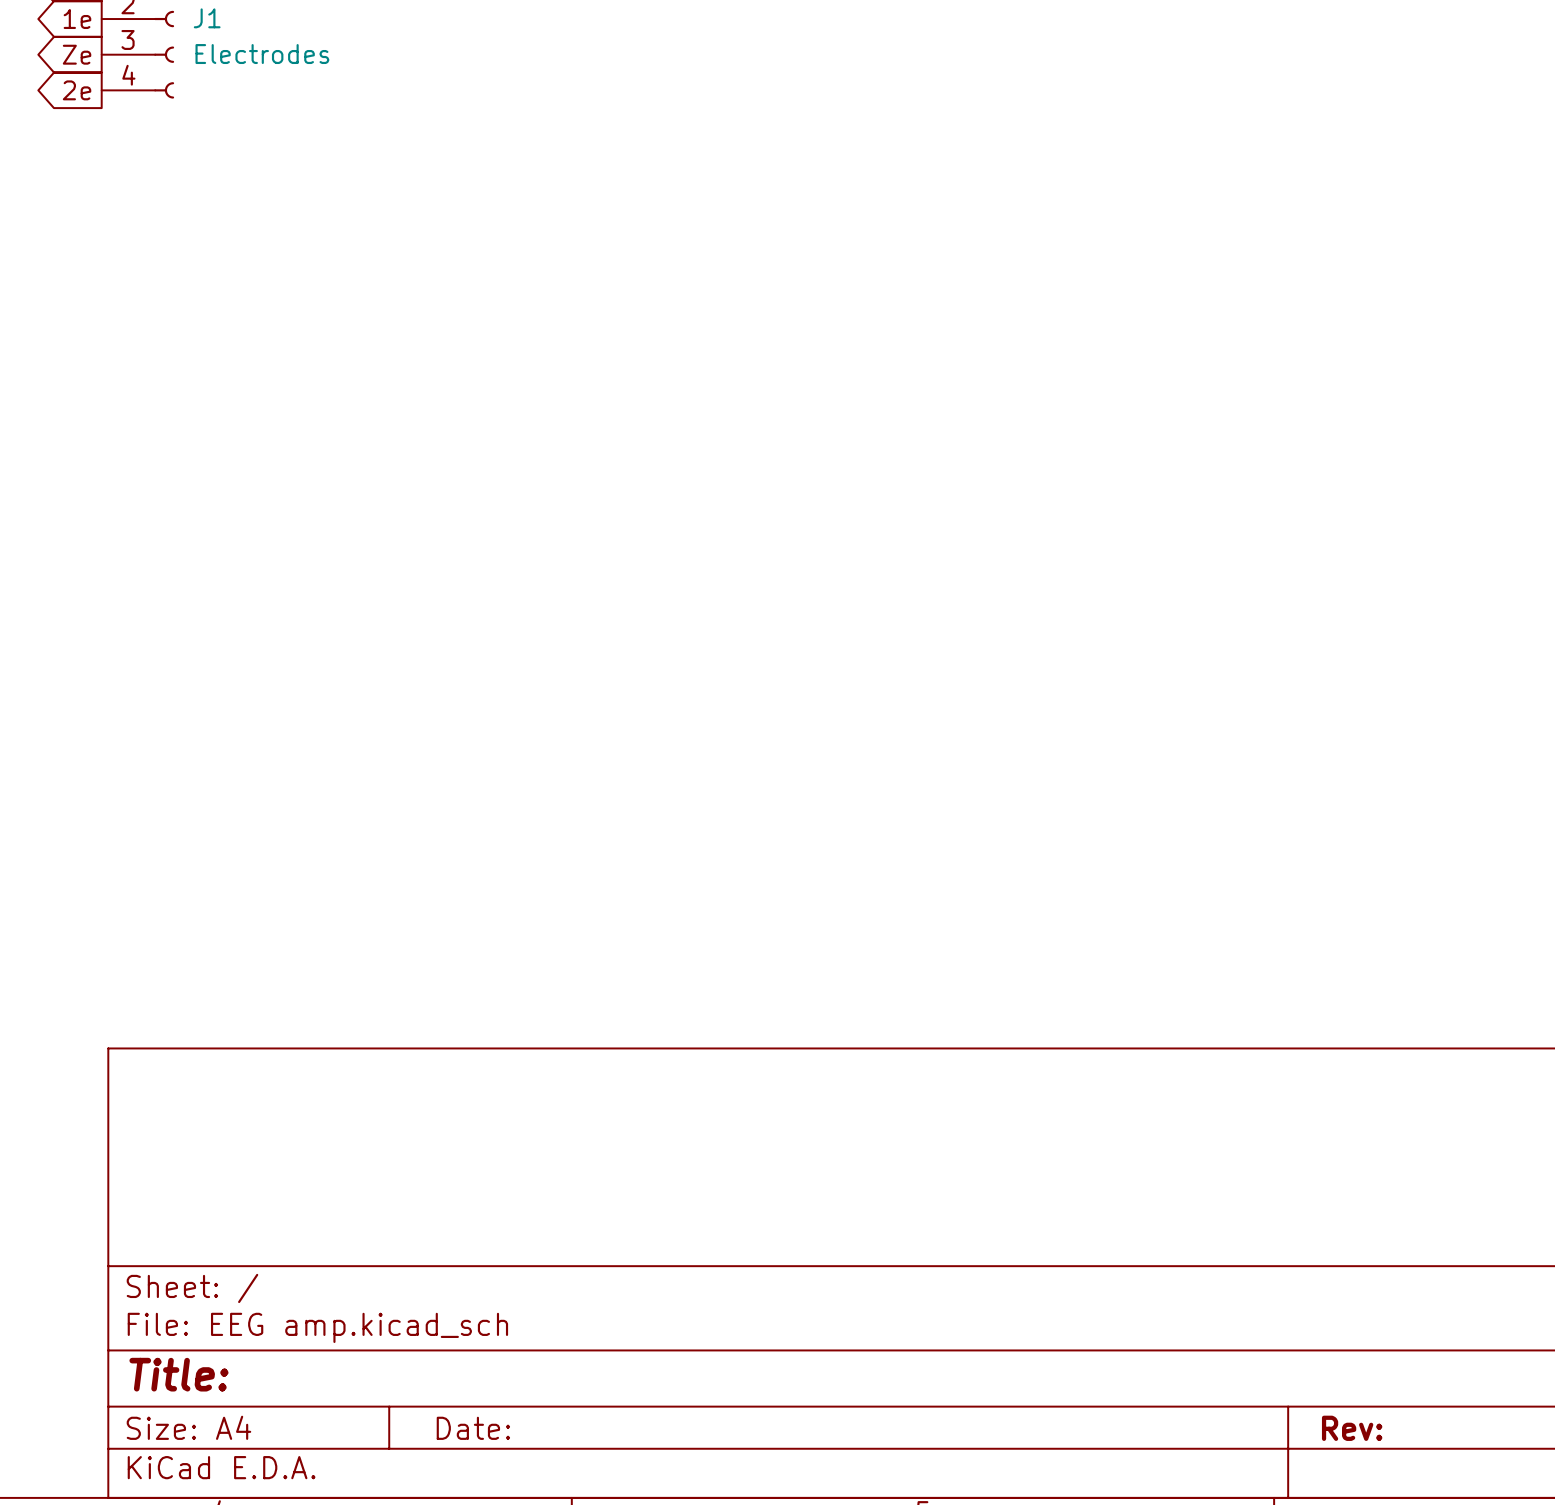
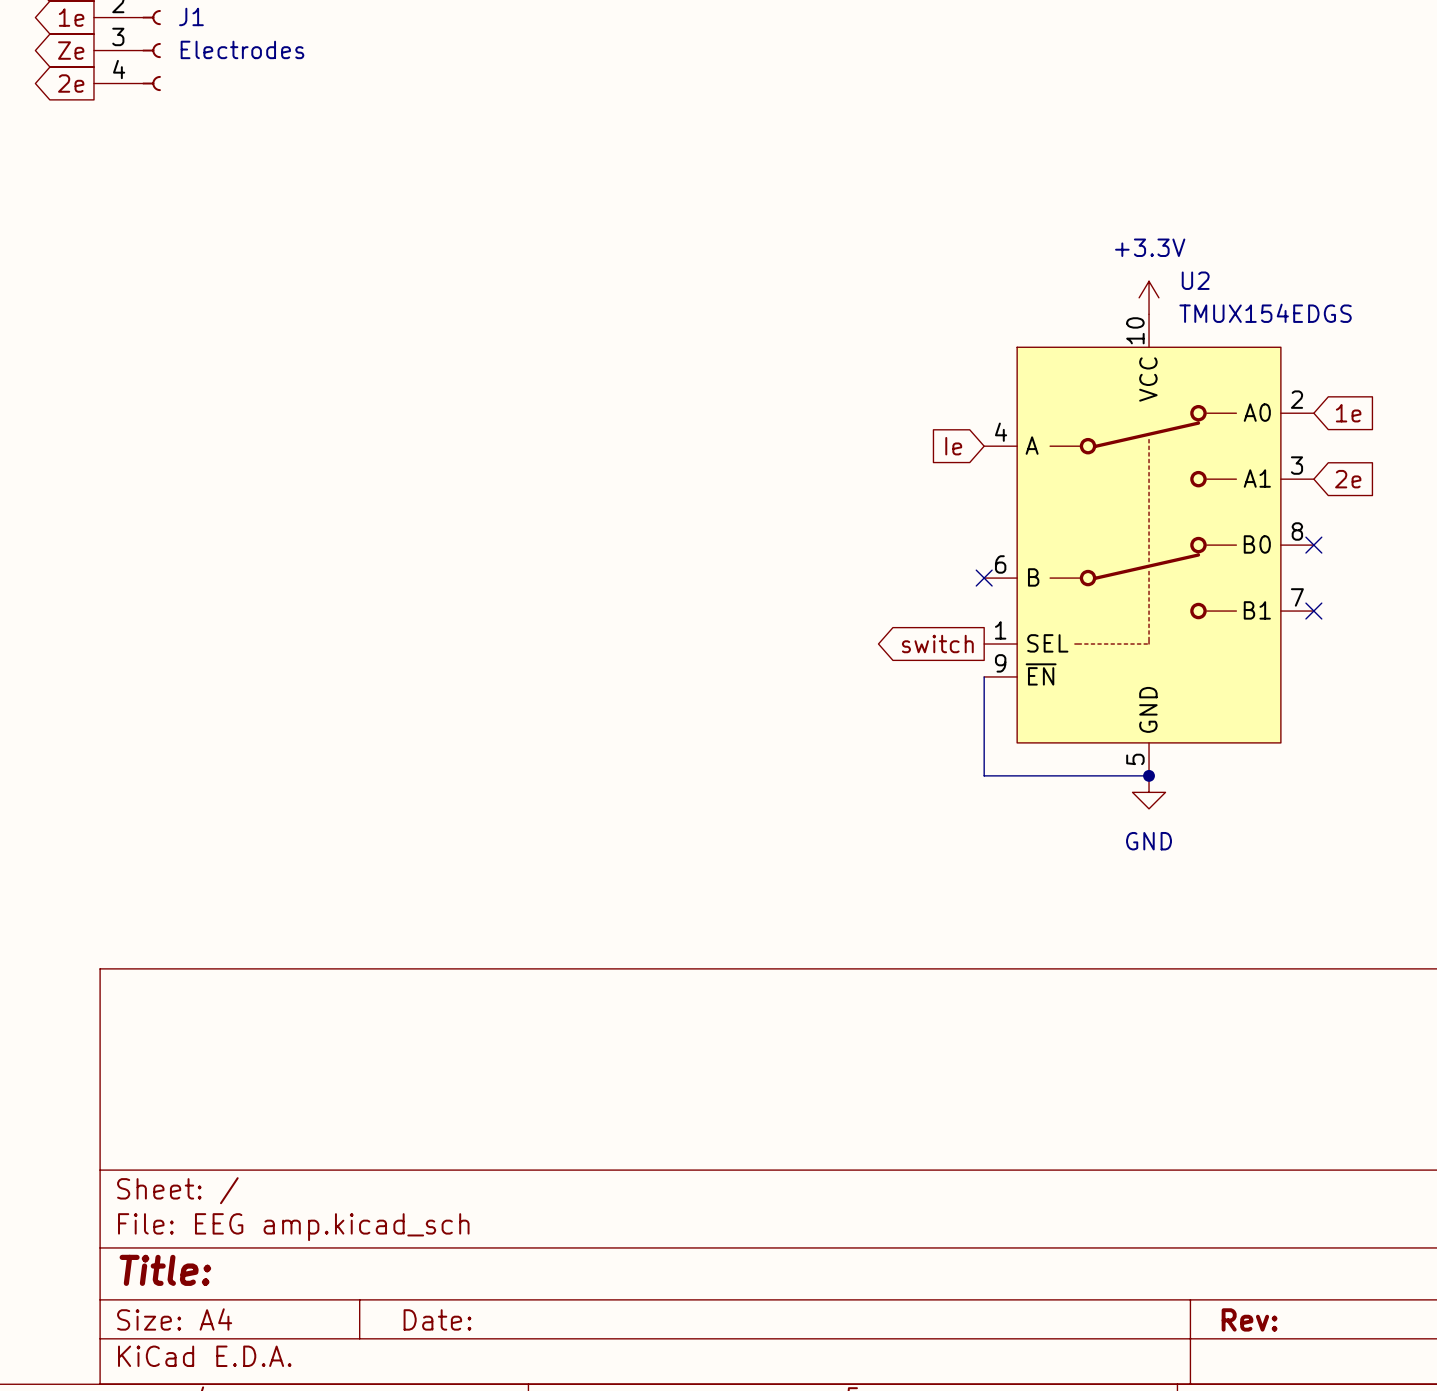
power symbol: none -> +3.3V (1149, 297)
global label: none -> 1e (1348, 413)
global label: none -> Ie (953, 446)
global label: none -> 2e (1348, 479)
U2: none -> TMUX154EDGS (1149, 545)
no-connect mark: none -> (1313, 545)
no-connect mark: none -> (984, 578)
no-connect mark: none -> (1313, 611)
global label: none -> switch (937, 644)
wire: none -> (984, 676) (984, 775) (1149, 775)
junction: none -> (1149, 775)
power symbol: none -> GND (1149, 792)

